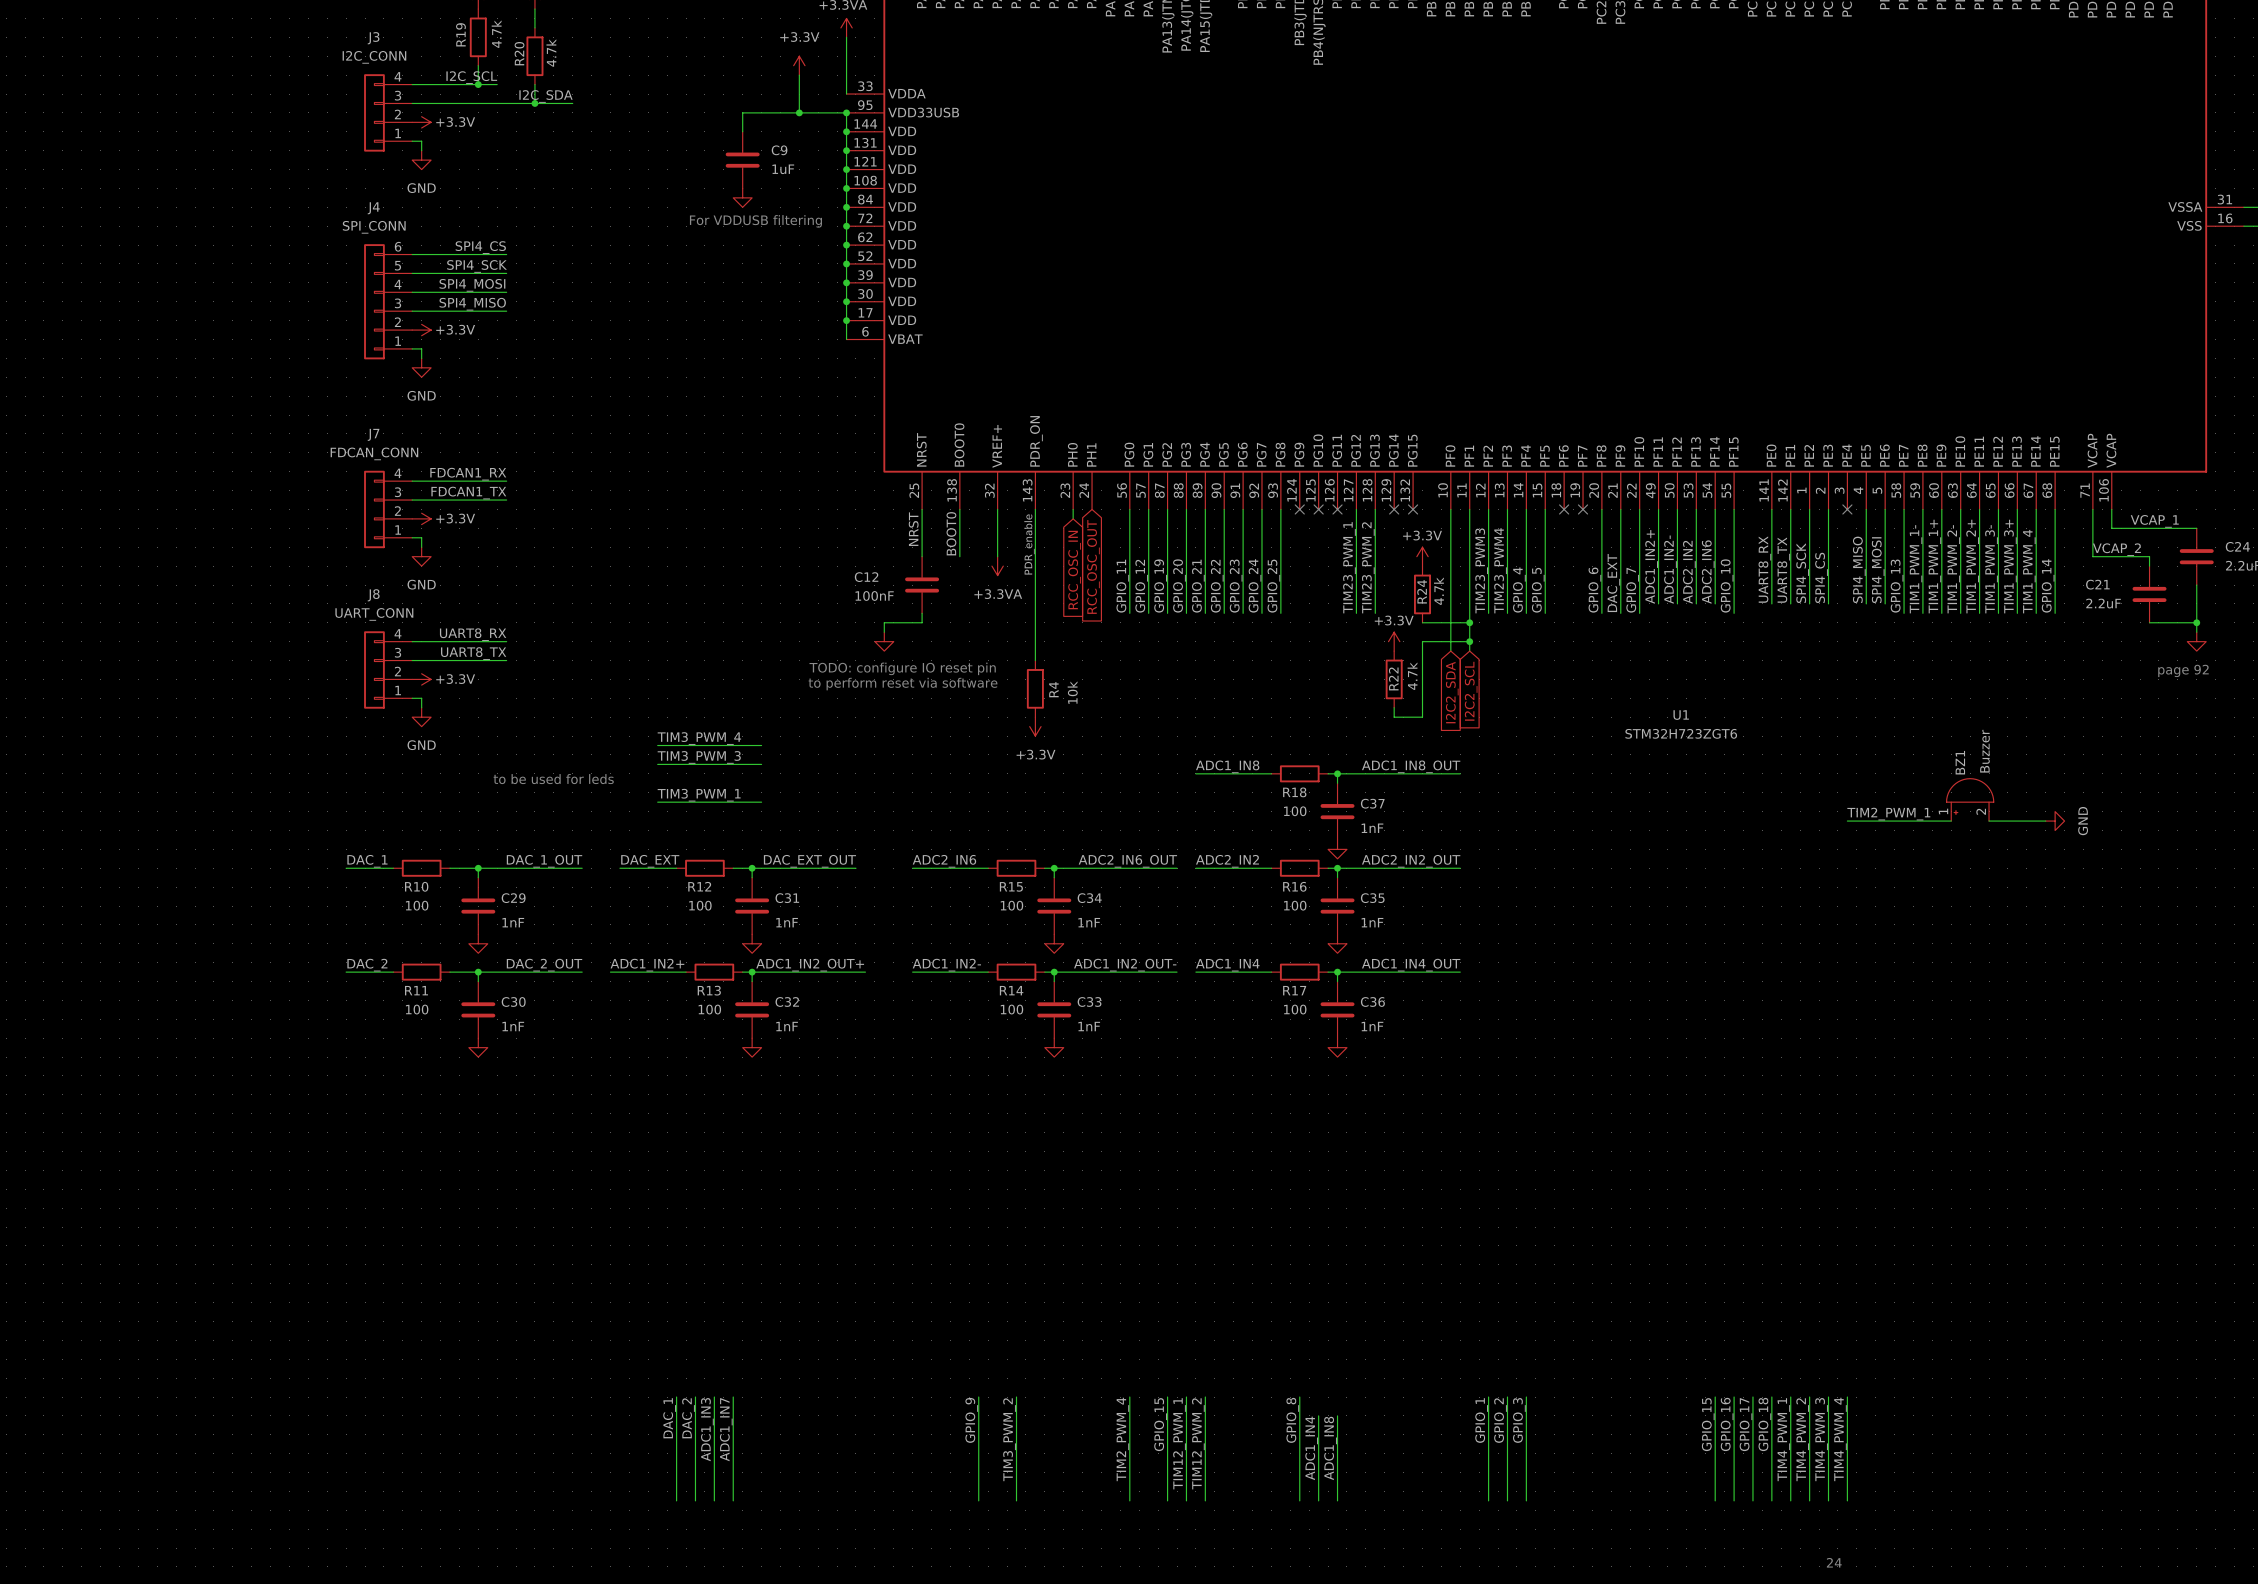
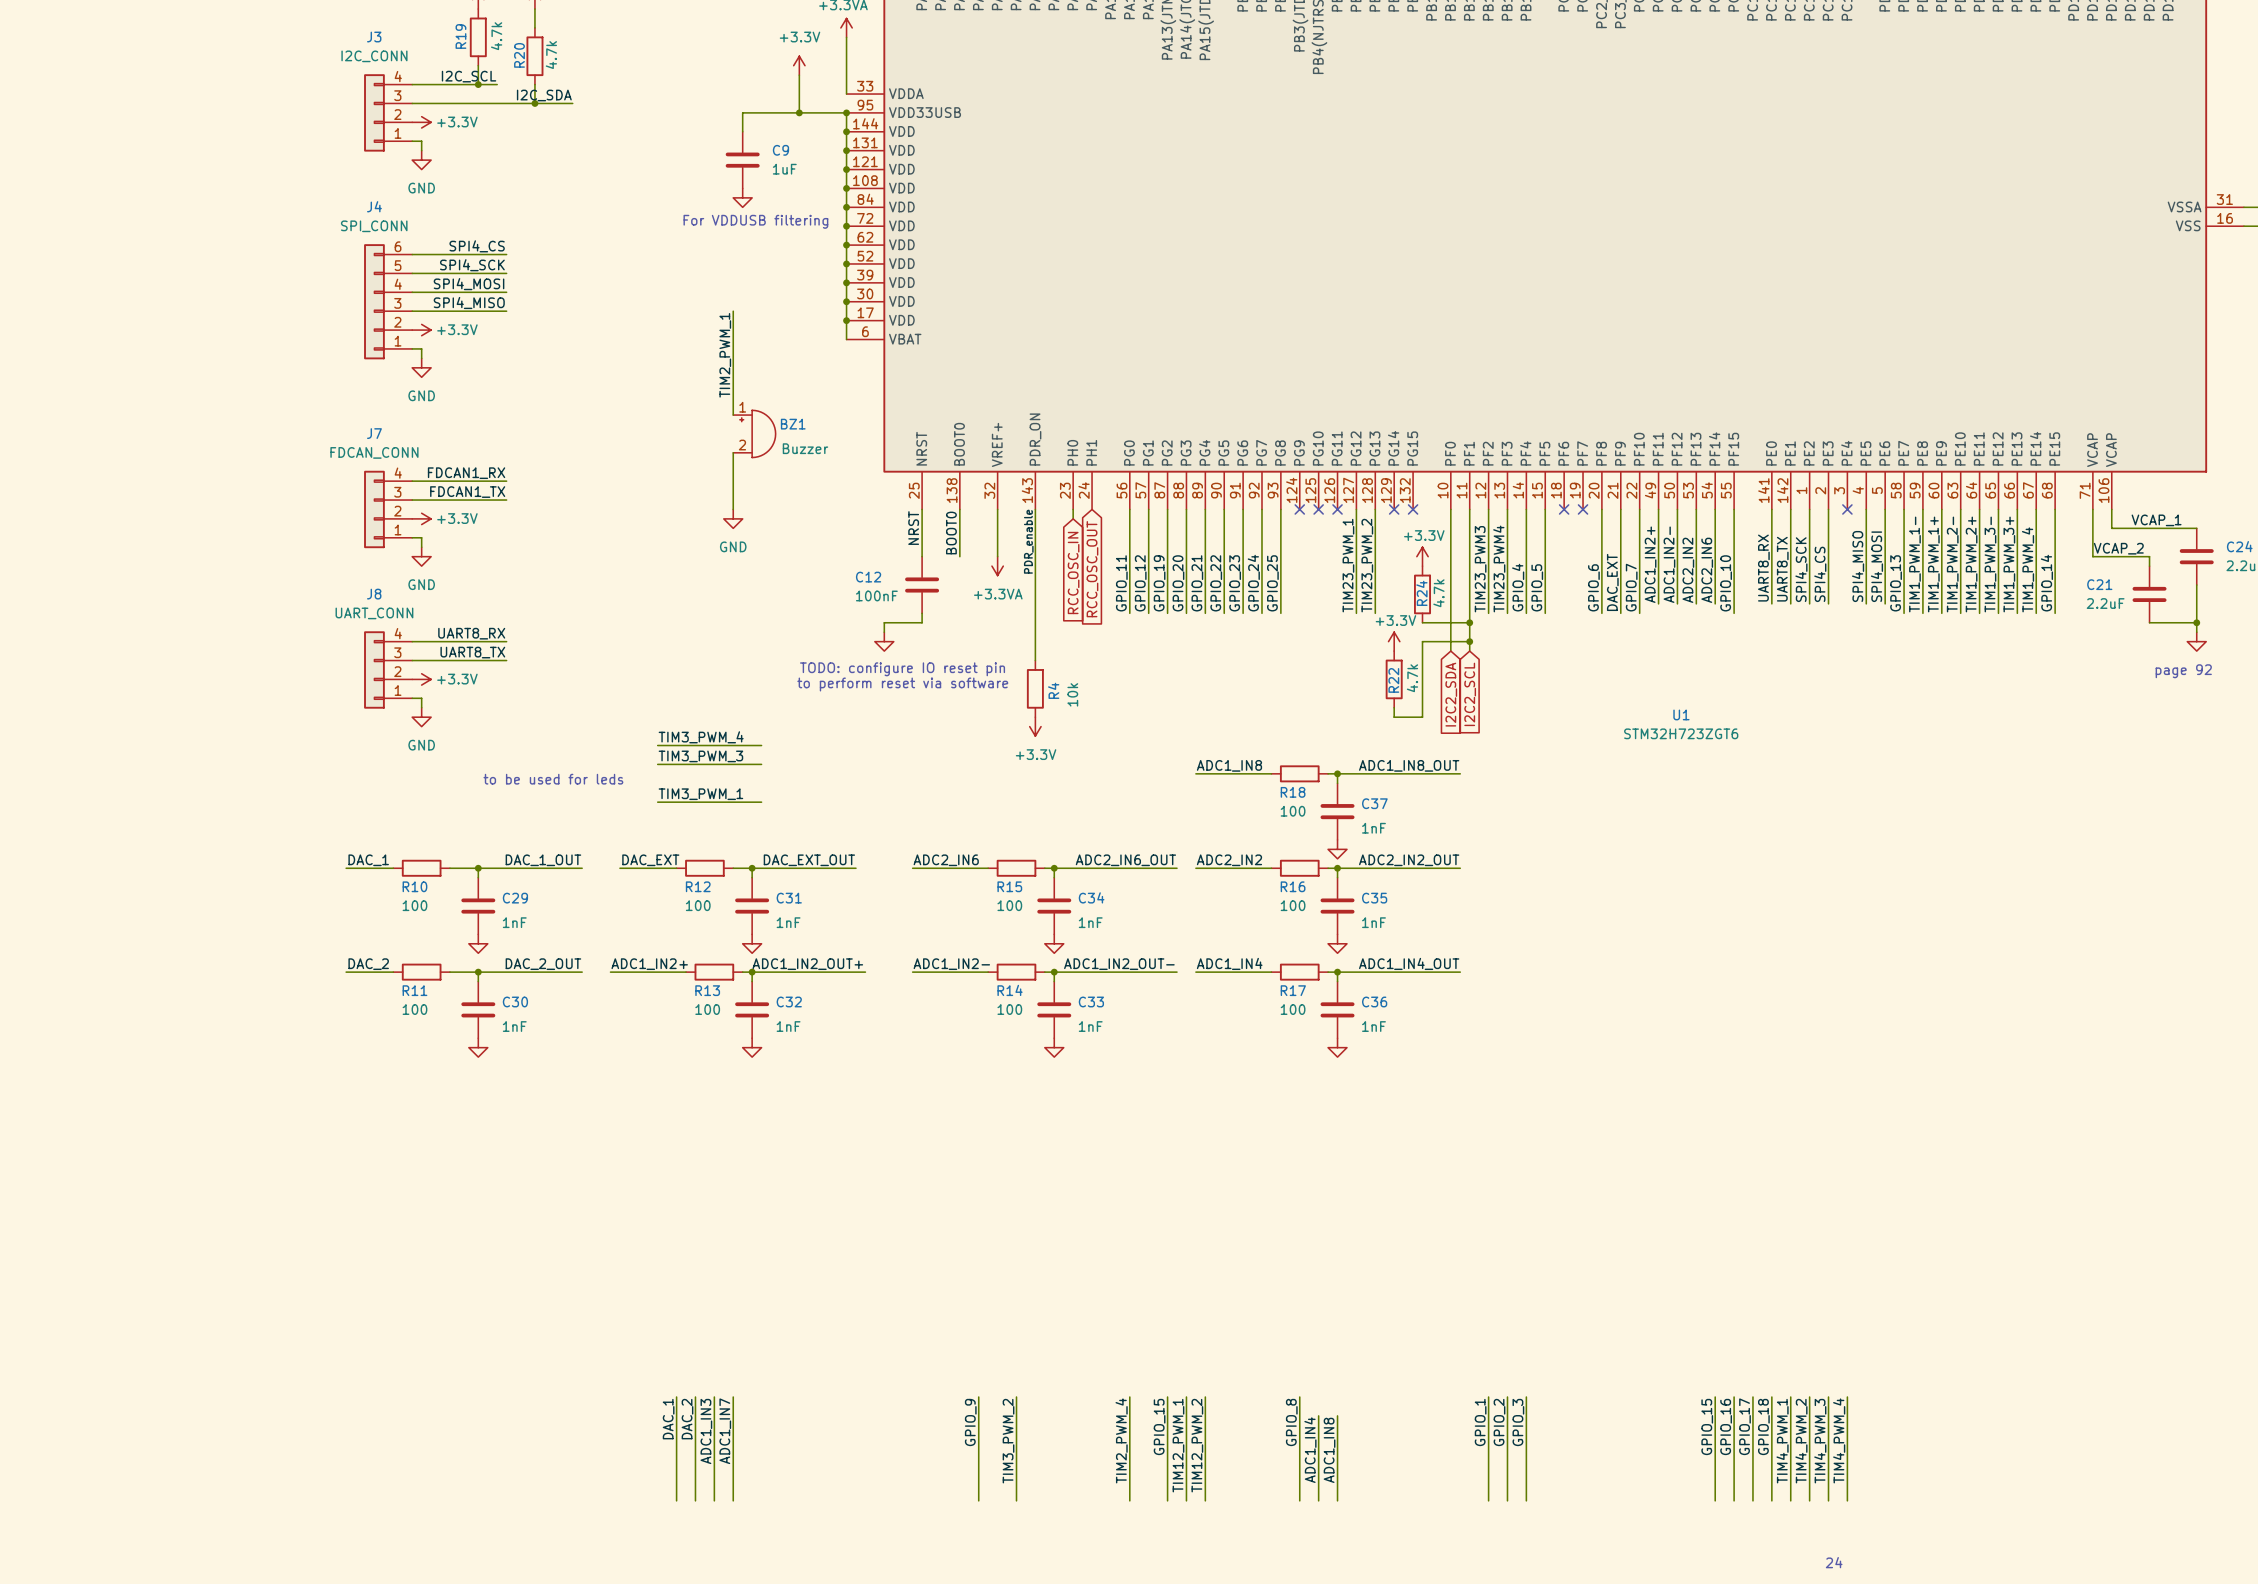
wire: none -> (733, 311) (733, 415)
label: none -> TIM2_PWM_1 (725, 355)
wire: none -> (733, 452) (733, 509)
power symbol: none -> GND (733, 518)
BZ1 rotation: 0° (1970, 796) -> 90° clockwise (757, 433)
BZ1 position: (1970, 799) -> (754, 433)
label: TIM2_PWM_1 (1888, 814) -> none
wire: (1847, 821) (1951, 821) -> none
wire: (1989, 821) (2045, 821) -> none
power symbol: GND (2055, 821) -> none

